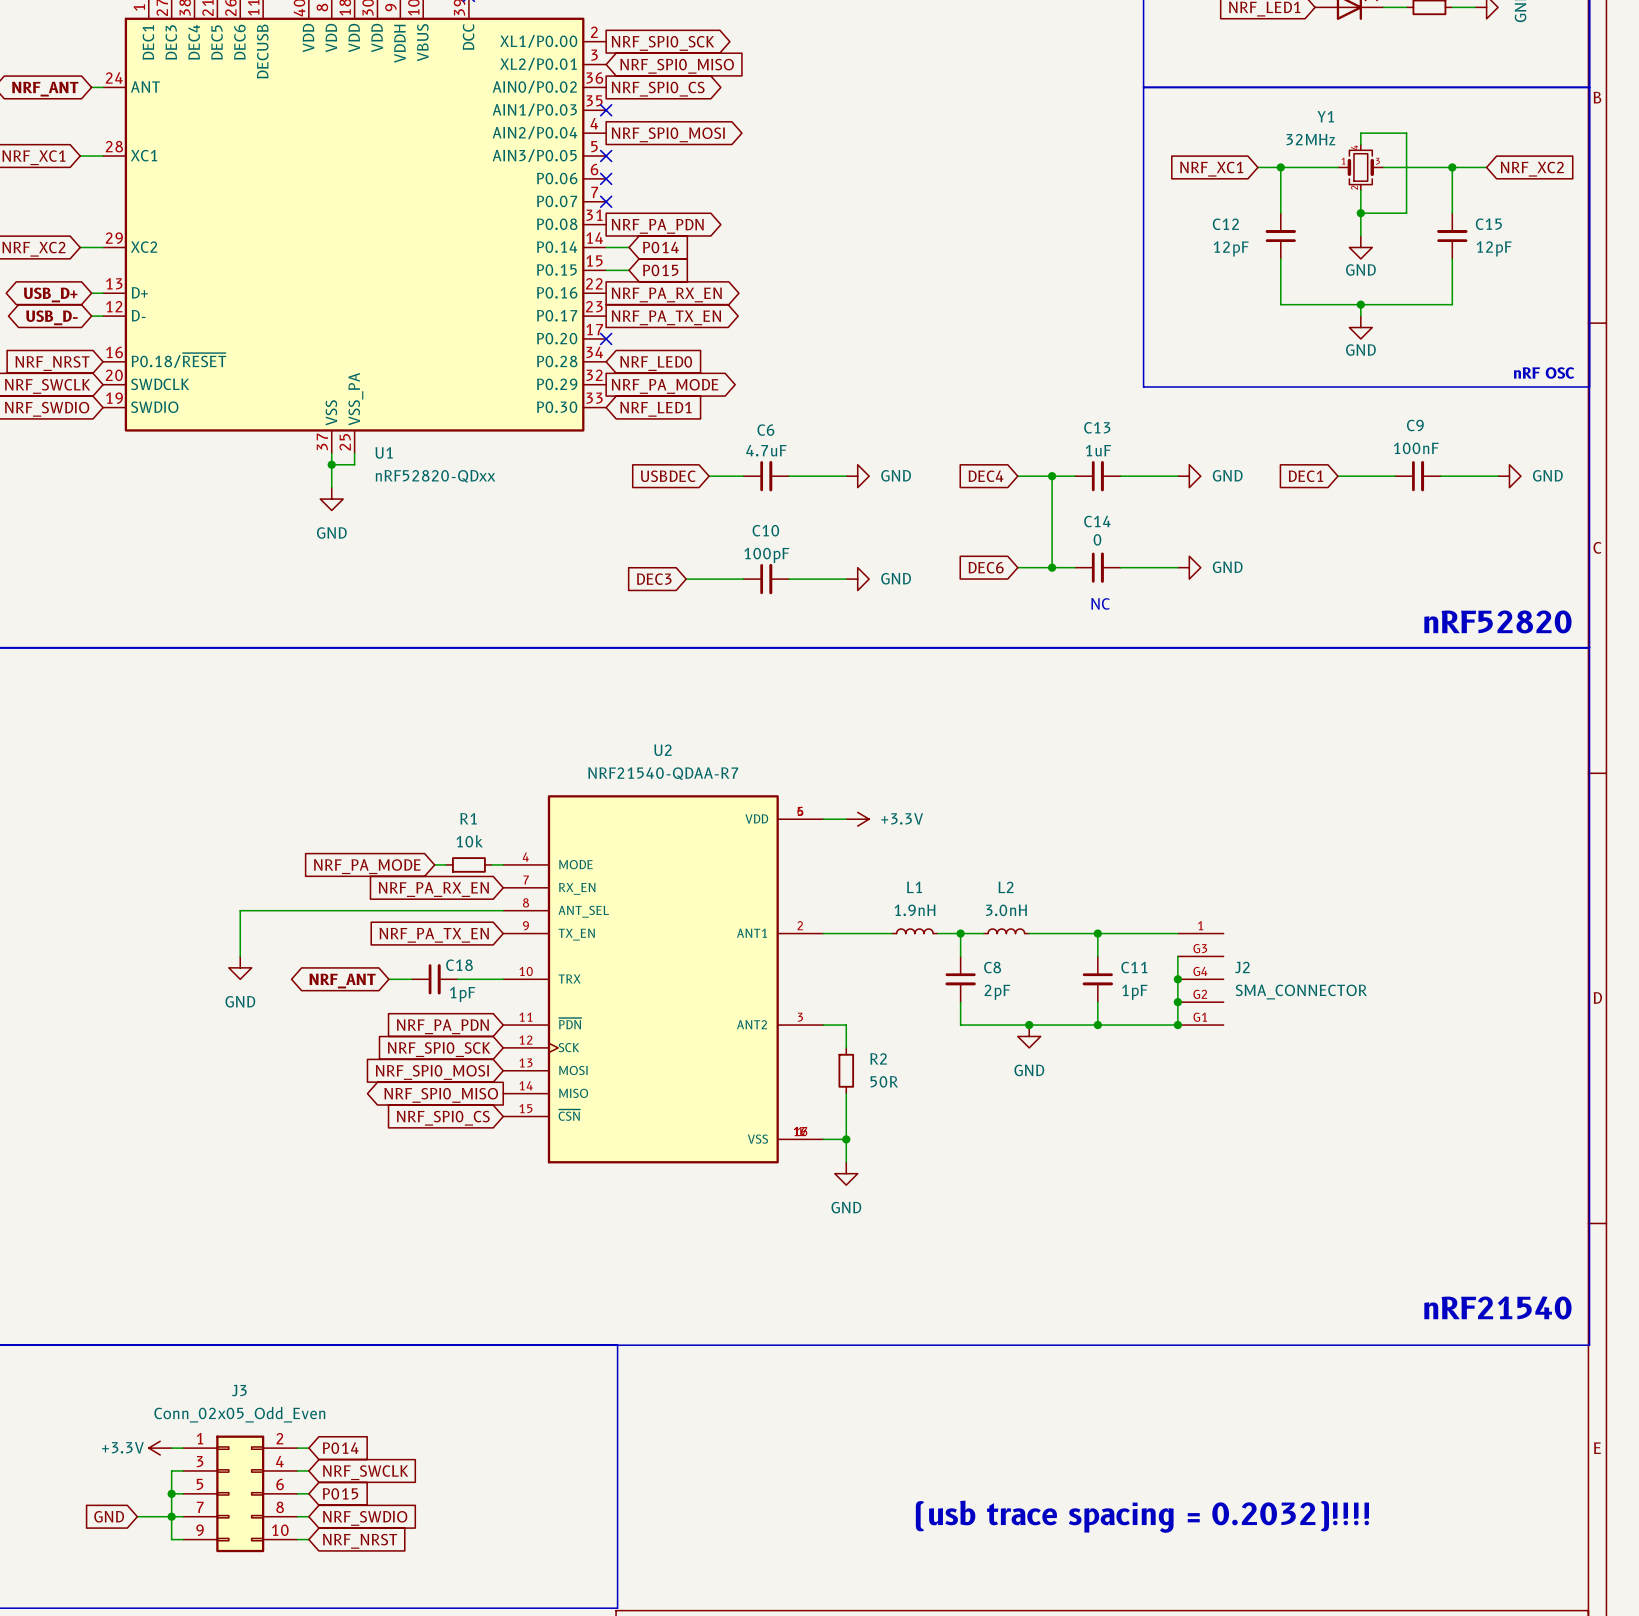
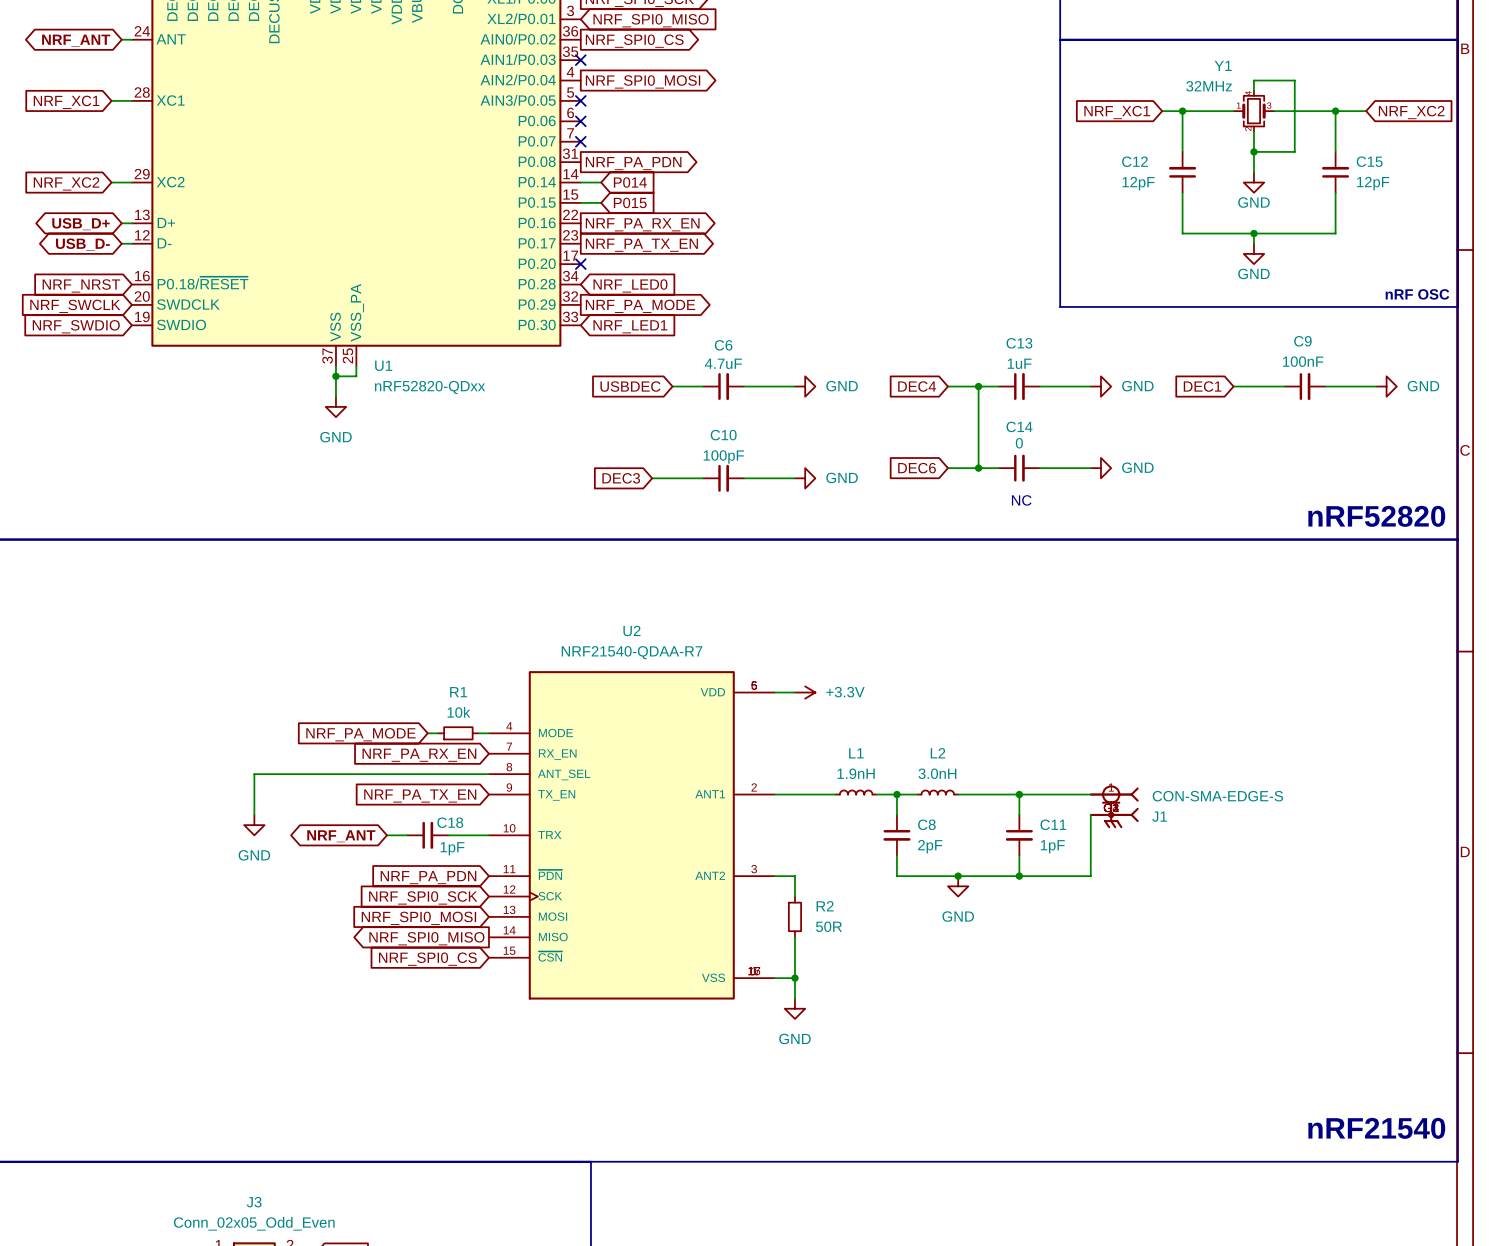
J1: none -> CON-SMA-EDGE-S (1114, 806)
junction: (1177, 979) -> none
J2: SMA_CONNECTOR (1200, 979) -> none
junction: (1177, 1002) -> none
junction: (1177, 1025) -> none

